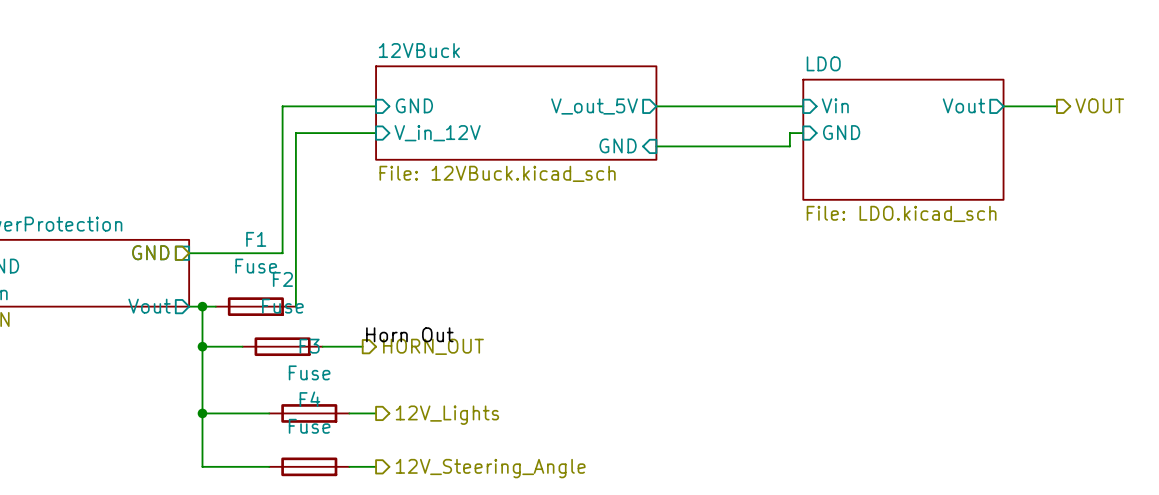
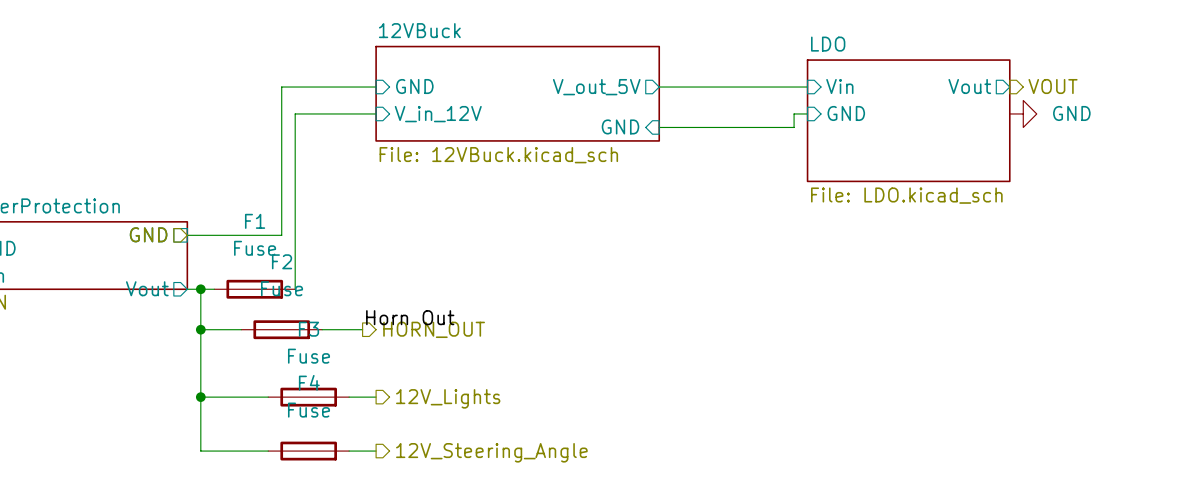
hierarchical label position: VOUT (1099, 105) -> VOUT (1053, 86)
wire: (1003, 106) (1056, 106) -> none
power symbol: none -> GND (1023, 113)

